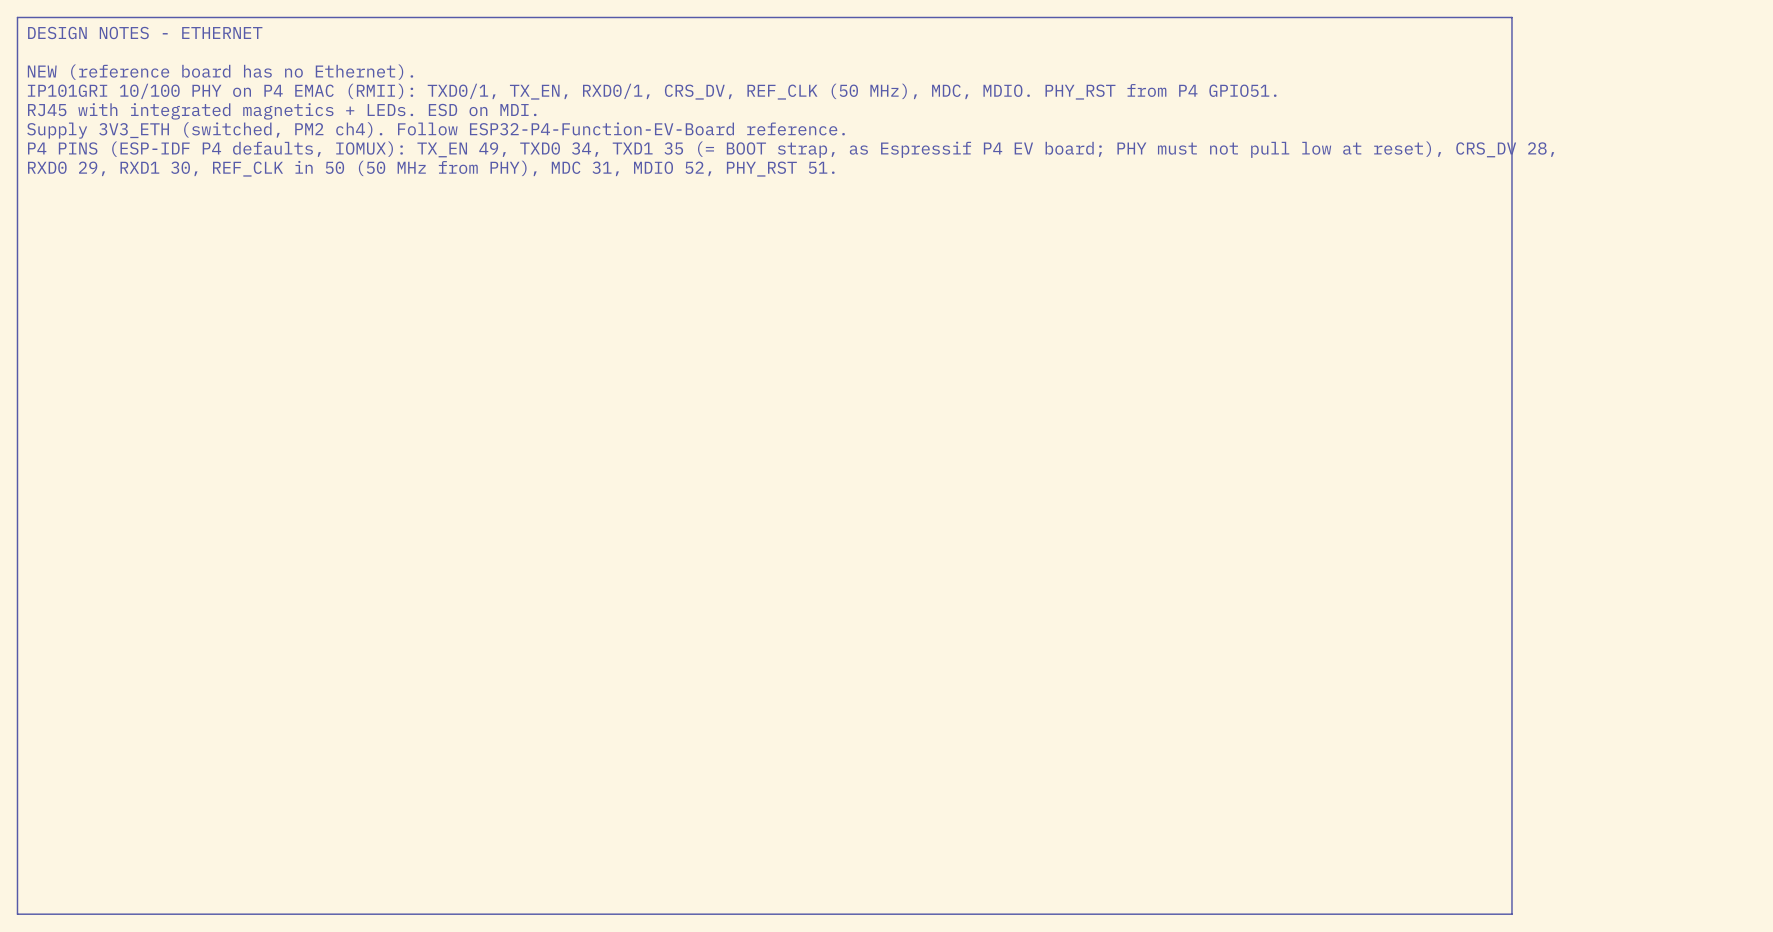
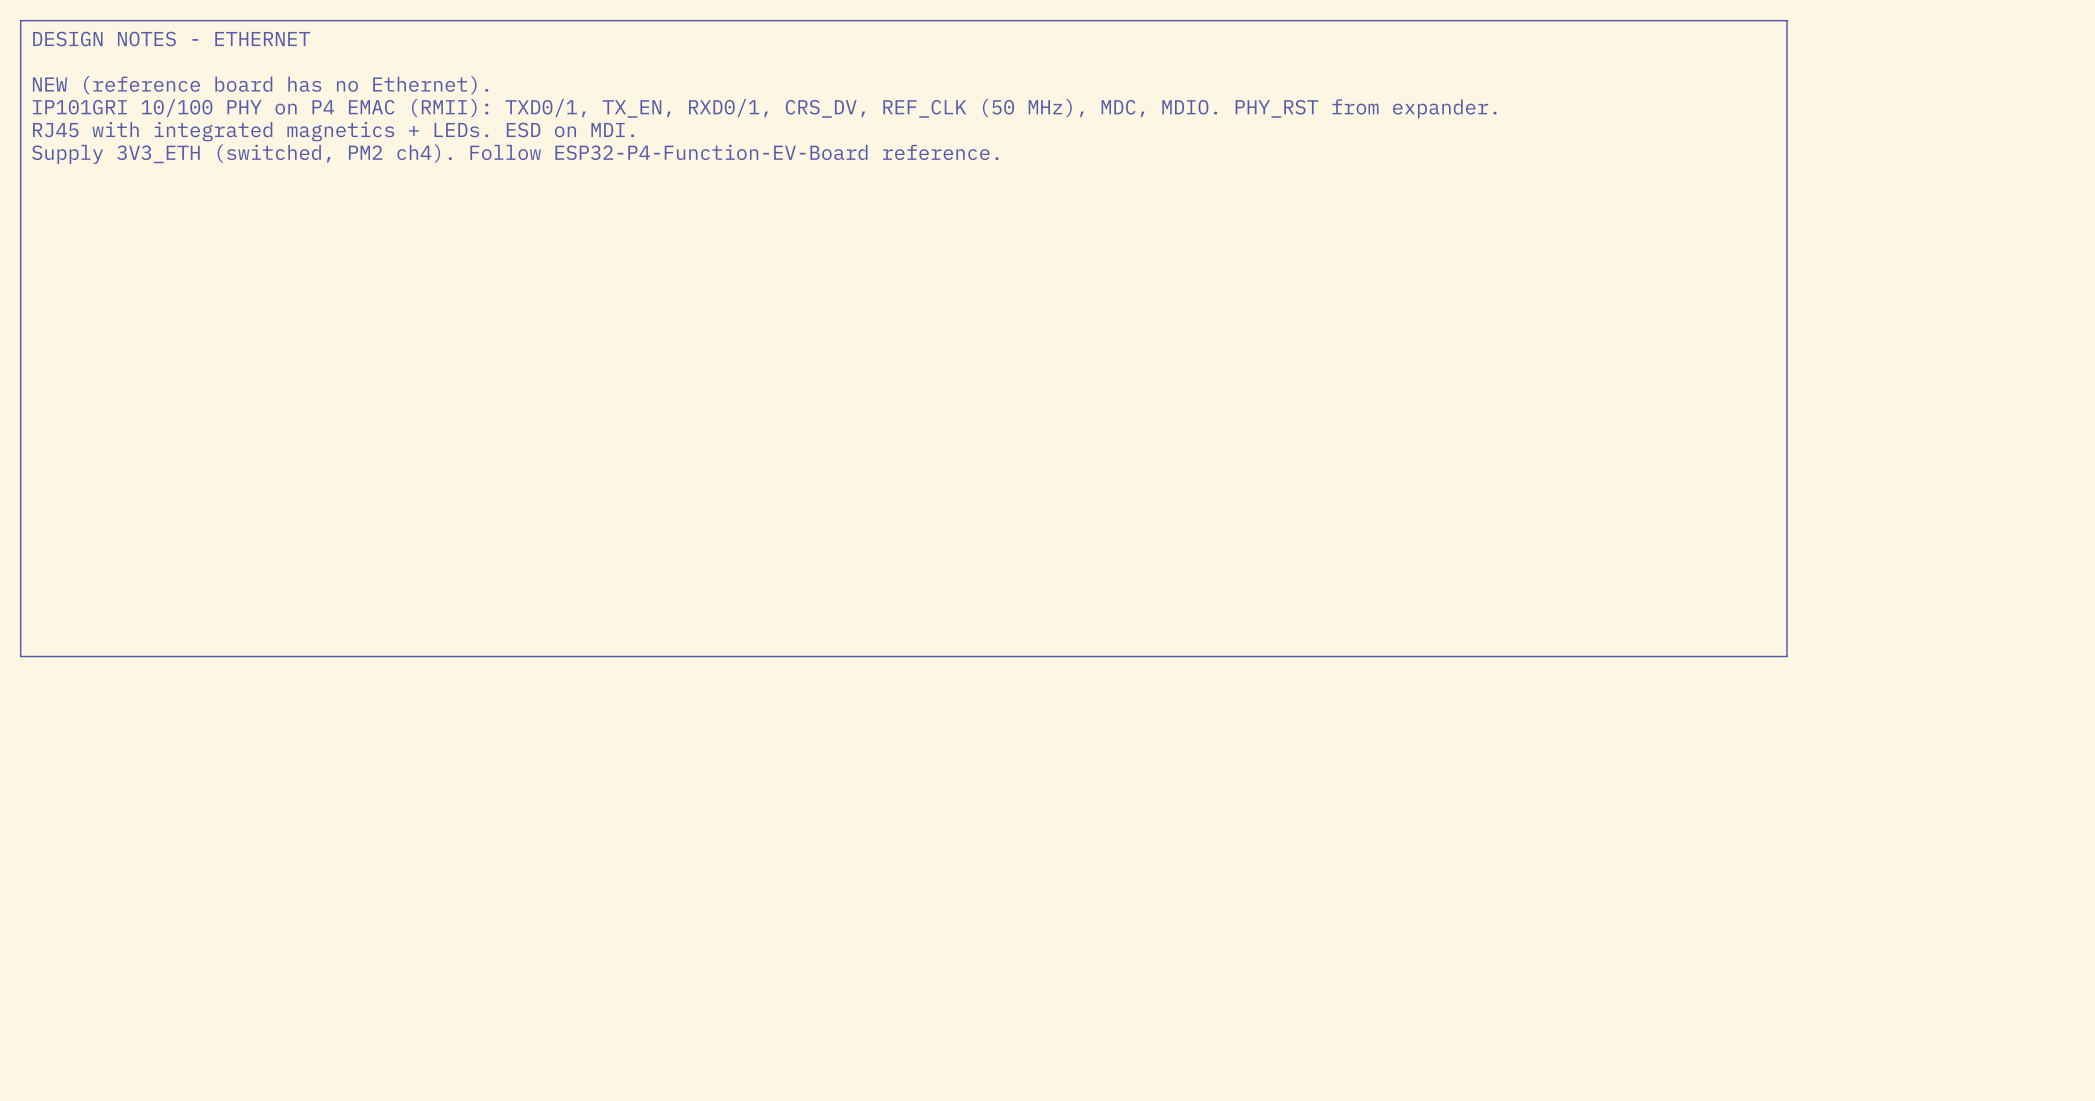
text: IP101GRI 10/100 PHY on P4 EMAC (RMII): TXD0/1, TX_EN, RXD0/1, CRS_DV, REF_CLK (50 MHz), MDC, MDIO. PHY_RST from P4 GPIO51. (652, 91) -> IP101GRI 10/100 PHY on P4 EMAC (RMII): TXD0/1, TX_EN, RXD0/1, CRS_DV, REF_CLK (50 MHz), MDC, MDIO. PHY_RST from expander. (764, 108)
text: P4 PINS (ESP-IDF P4 defaults, IOMUX): TX_EN 49, TXD0 34, TXD1 35 (= BOOT strap, as Espressif P4 EV board; PHY must not pull low at reset), CRS_DV 28, (791, 149) -> none
text: RXD0 29, RXD1 30, REF_CLK in 50 (50 MHz from PHY), MDC 31, MDIO 52, PHY_RST 51. (431, 168) -> none
line: (17, 555) (17, 914) (1511, 914) (1511, 555) -> (20, 656) (1786, 656)

